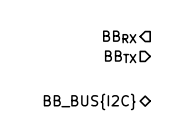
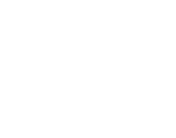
hierarchical label: BBRX (119, 36) -> none
hierarchical label: BBTX (120, 56) -> none
hierarchical label: BB_BUS{I2C} (89, 101) -> none

